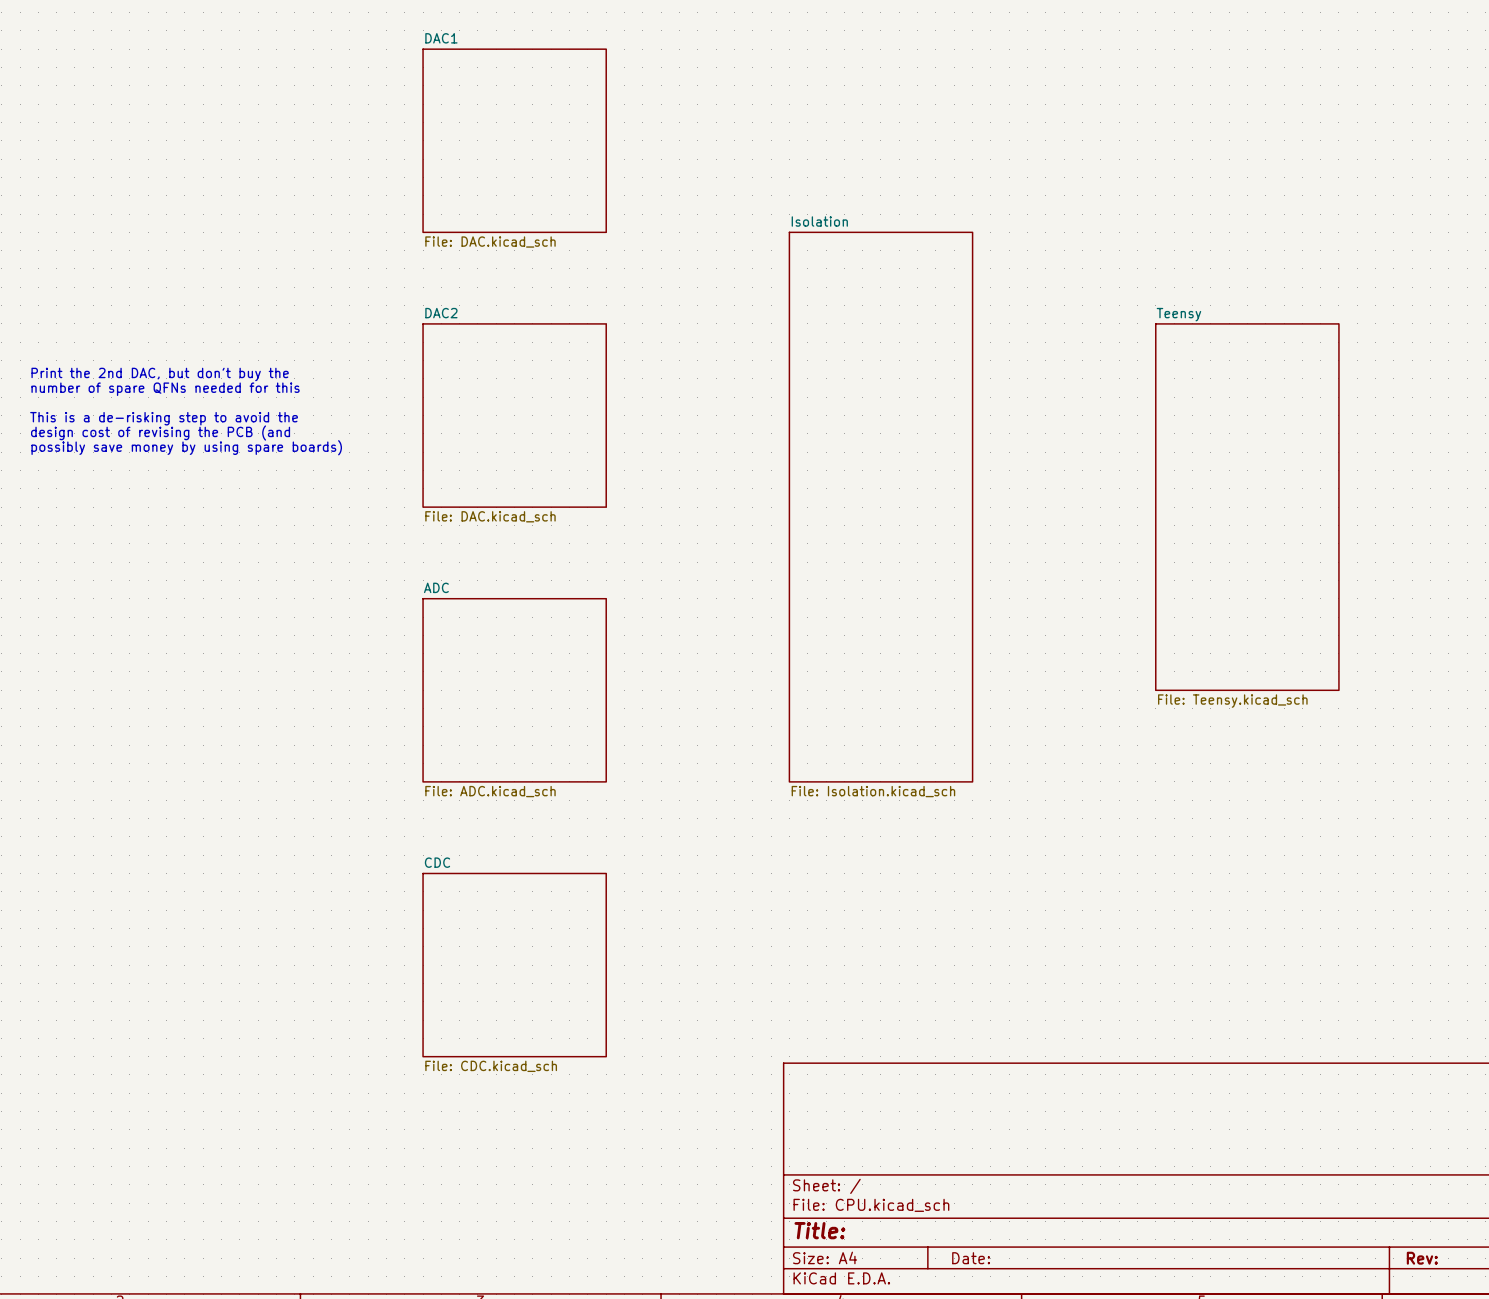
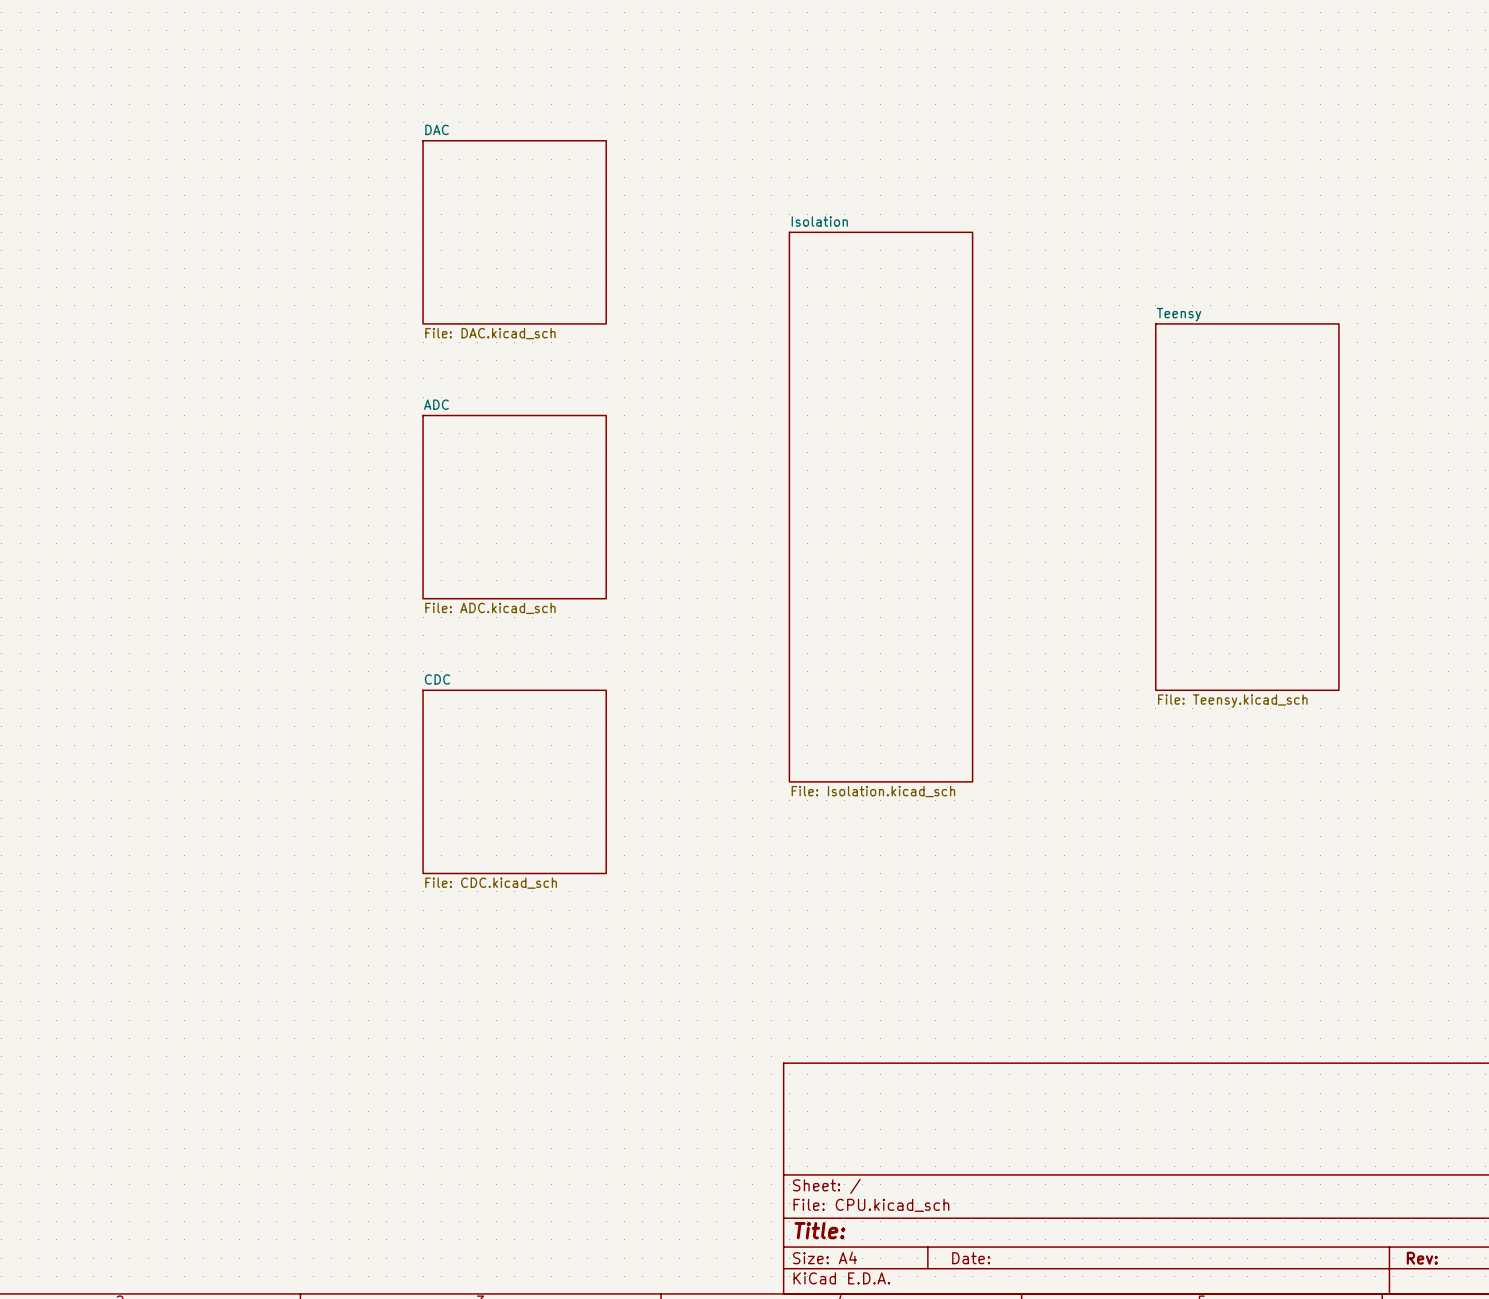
sheet DAC1: File: DAC.kicad_sch (514, 140) -> none
sheet DAC: none -> File: DAC.kicad_sch (514, 232)
text: Print the 2nd DAC, but don't buy the (160, 374) -> none
text: number of spare QFNs needed for this (165, 389) -> none
sheet DAC2: File: DAC.kicad_sch (514, 415) -> none
text: This is a de-risking step to avoid the (164, 418) -> none
text: design cost of revising the PCB (and (160, 433) -> none
text: possibly save money by using spare boards) (186, 447) -> none
sheet ADC: none -> File: ADC.kicad_sch (514, 507)
sheet ADC: File: ADC.kicad_sch (514, 690) -> none
sheet CDC: none -> File: CDC.kicad_sch (514, 781)
sheet CDC: File: CDC.kicad_sch (514, 965) -> none

